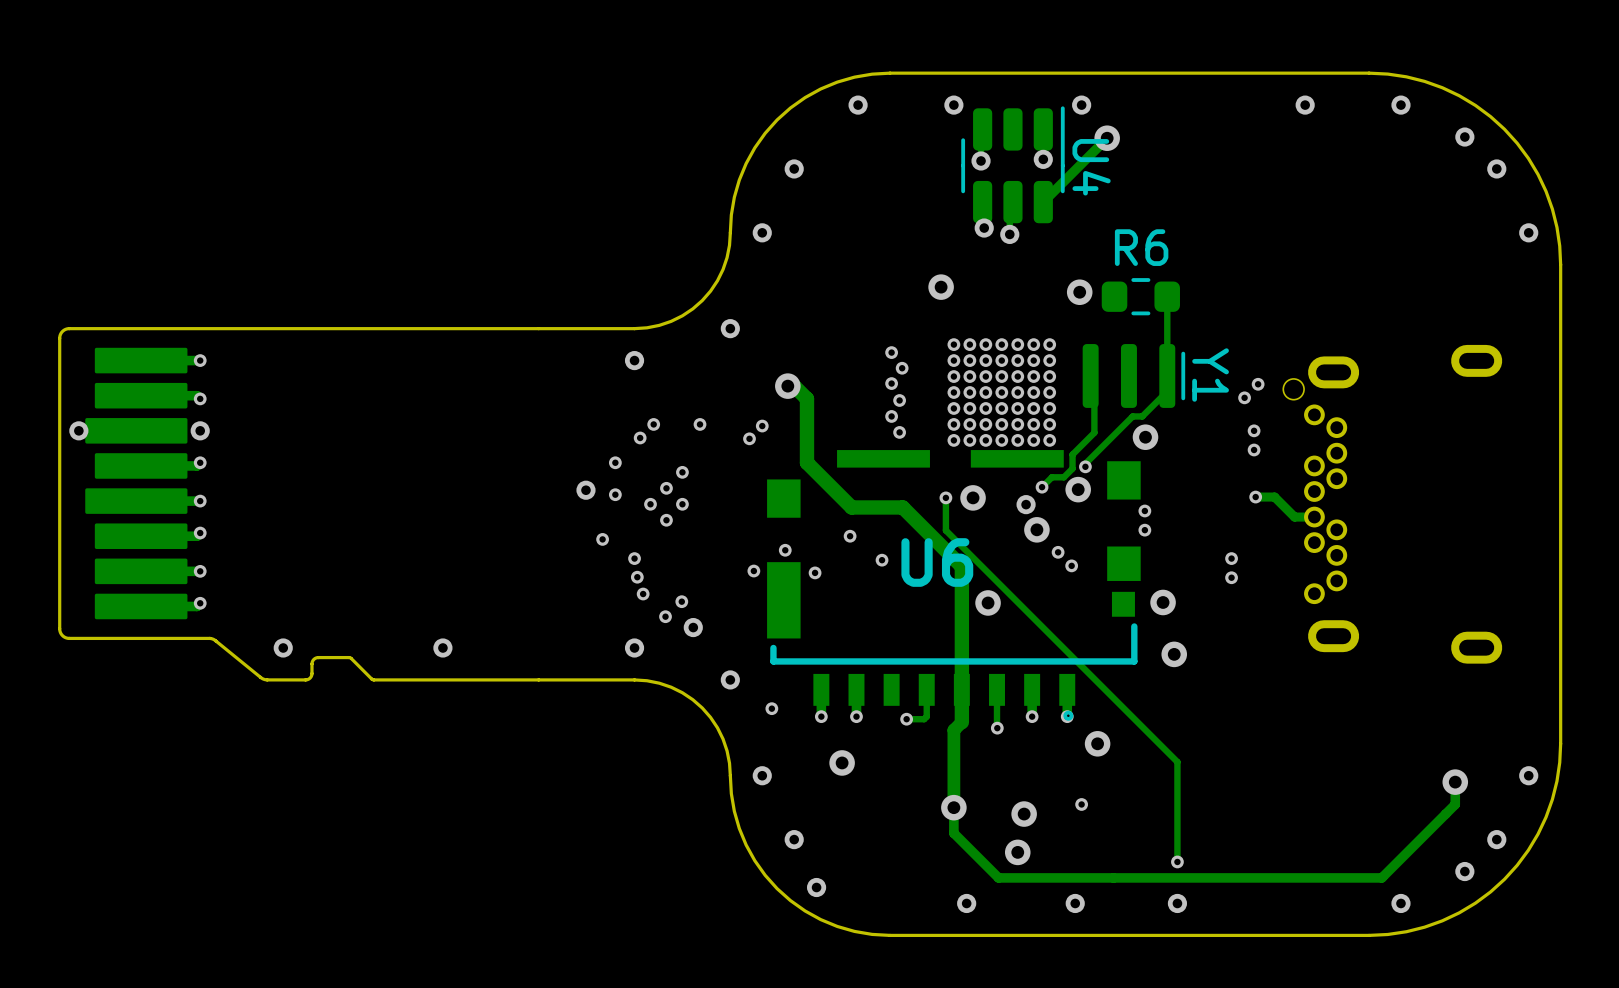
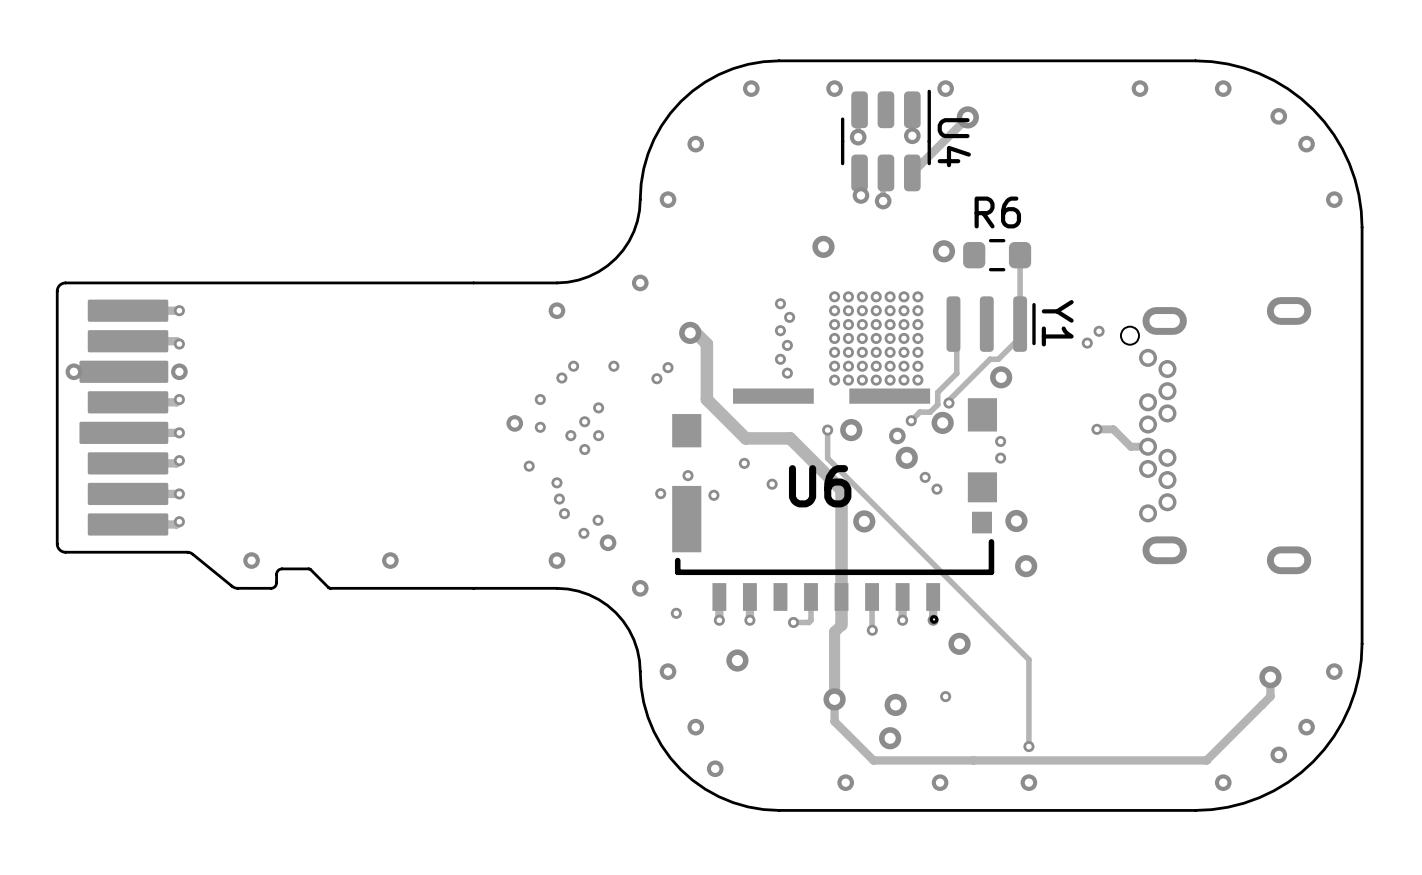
via: (1254, 430) -> none
via: (1254, 449) -> none
via: (1231, 558) -> none
via: (1231, 577) -> none

